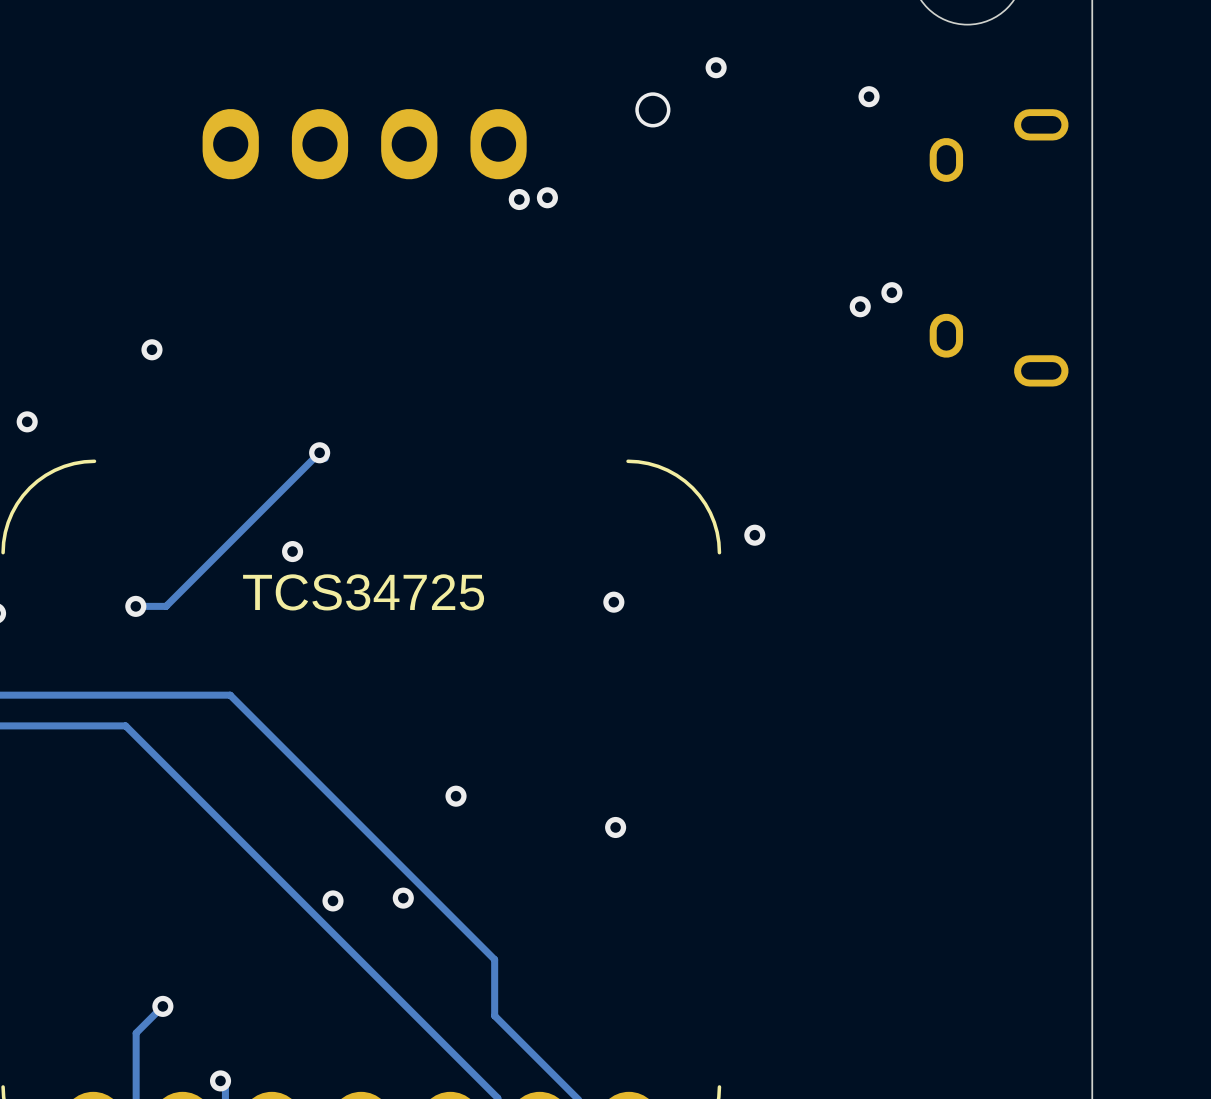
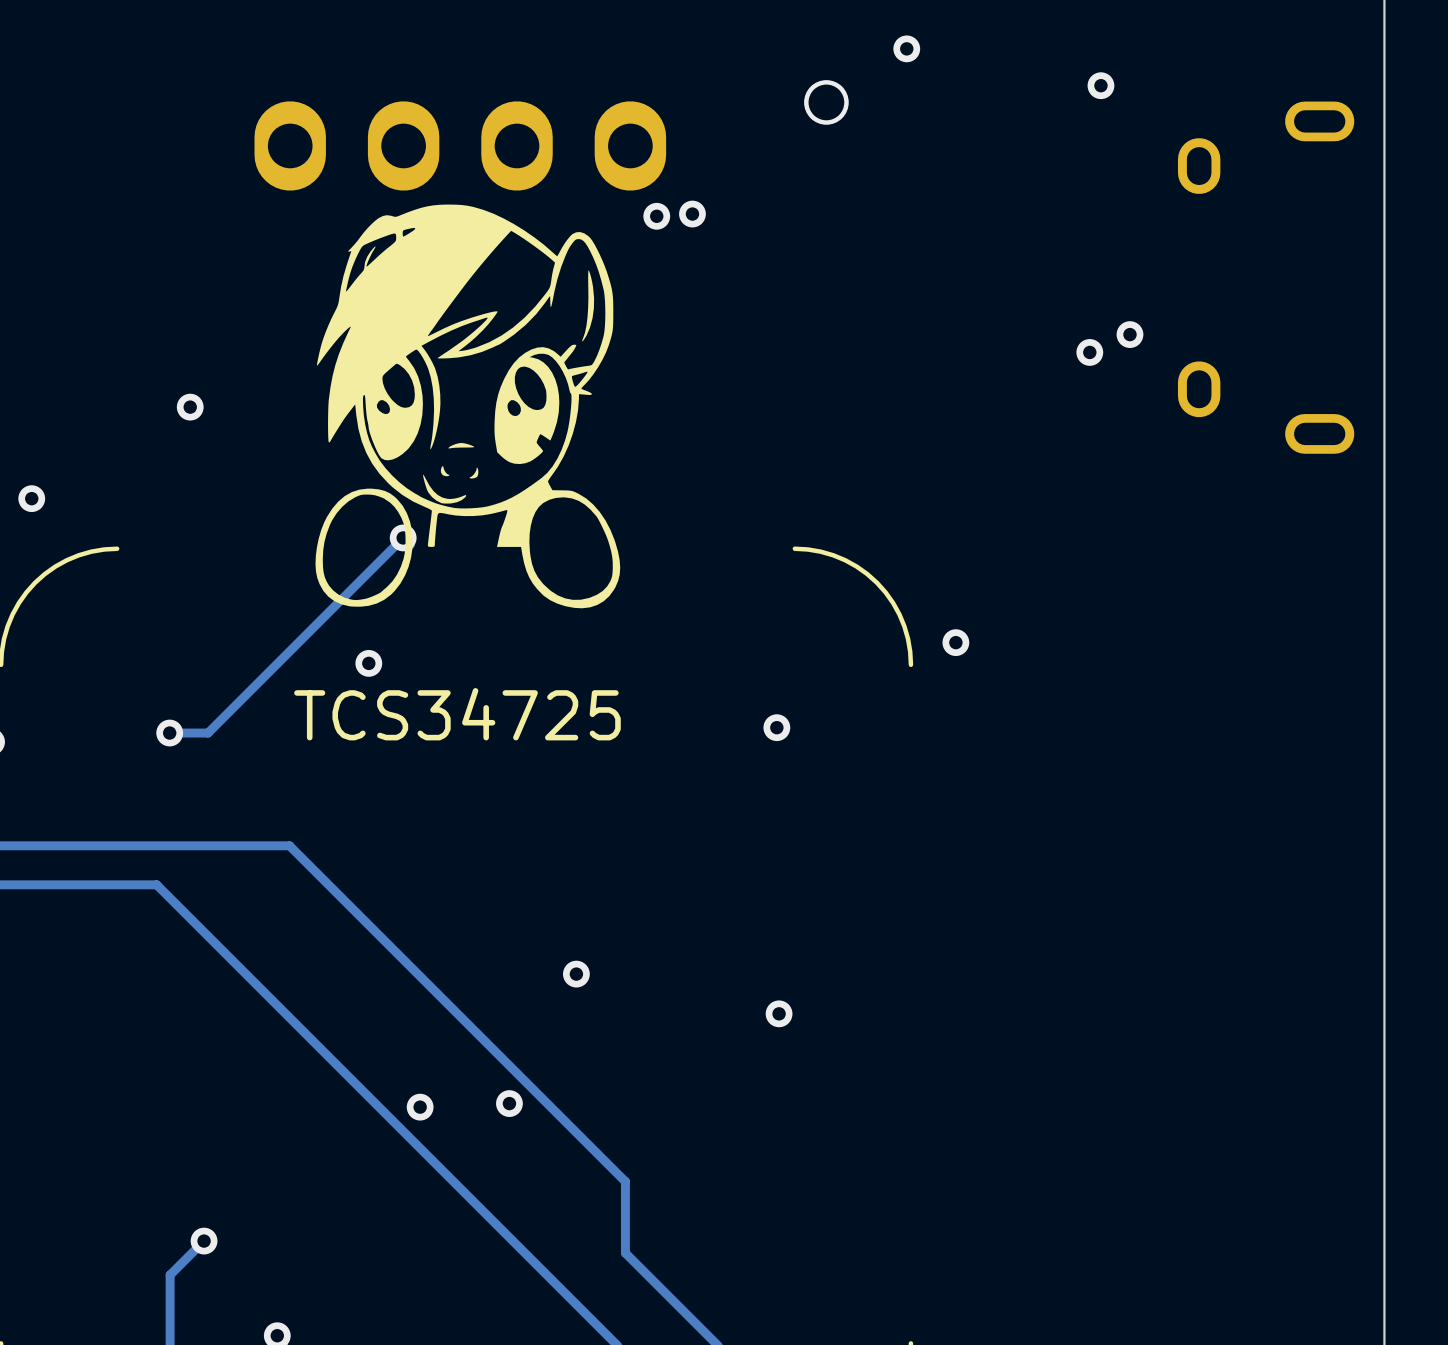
drawing: none -> [315, 204, 621, 609]

